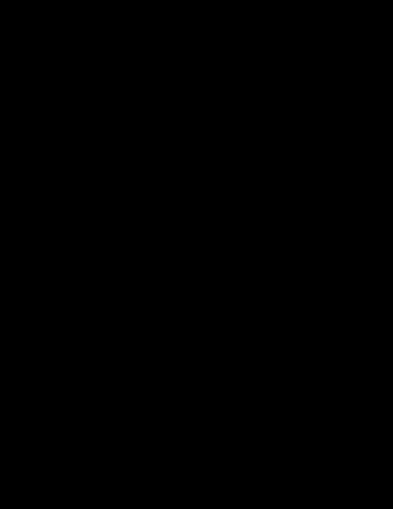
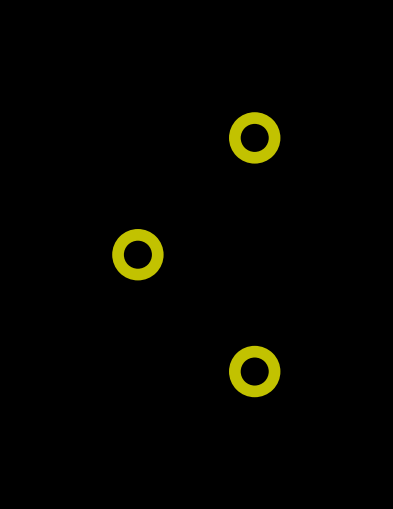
part: none -> (196, 254)

